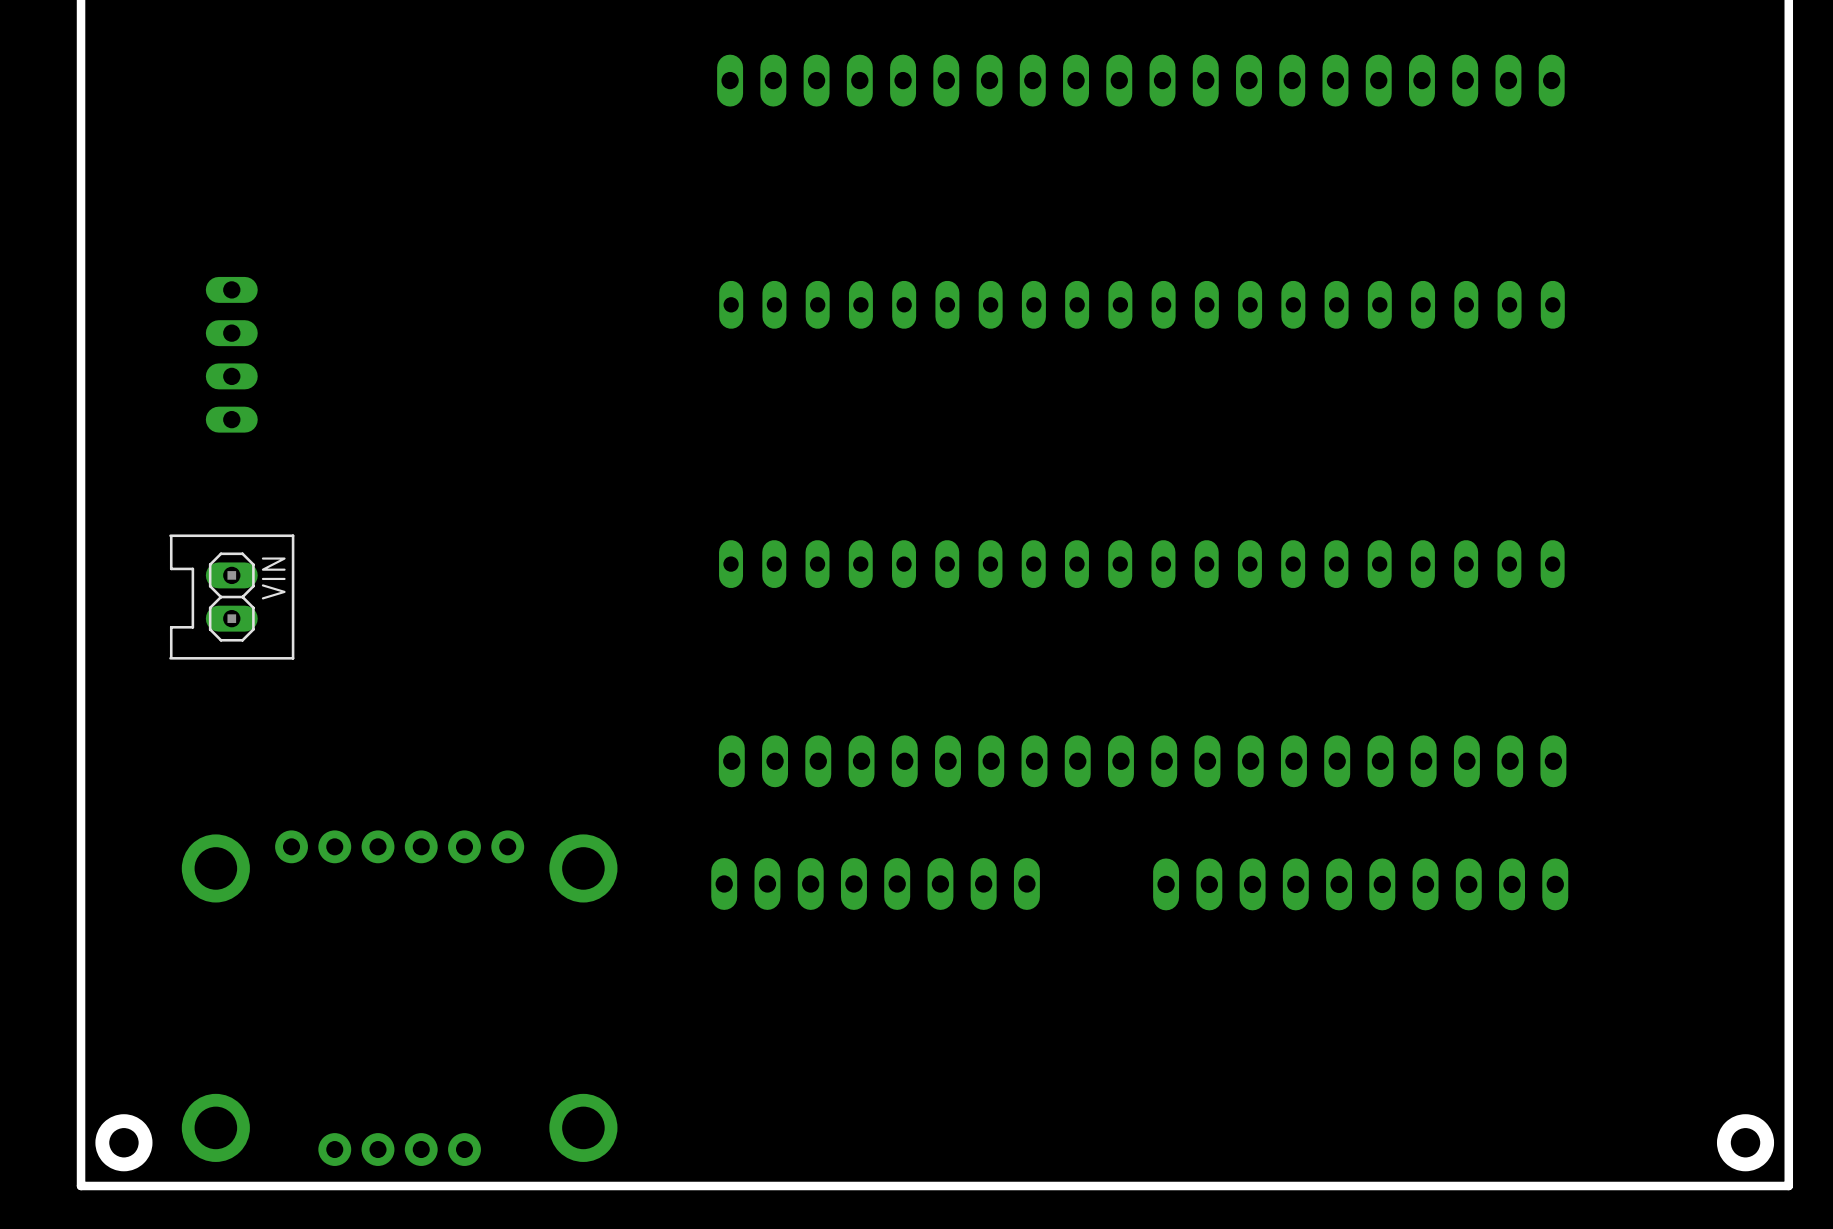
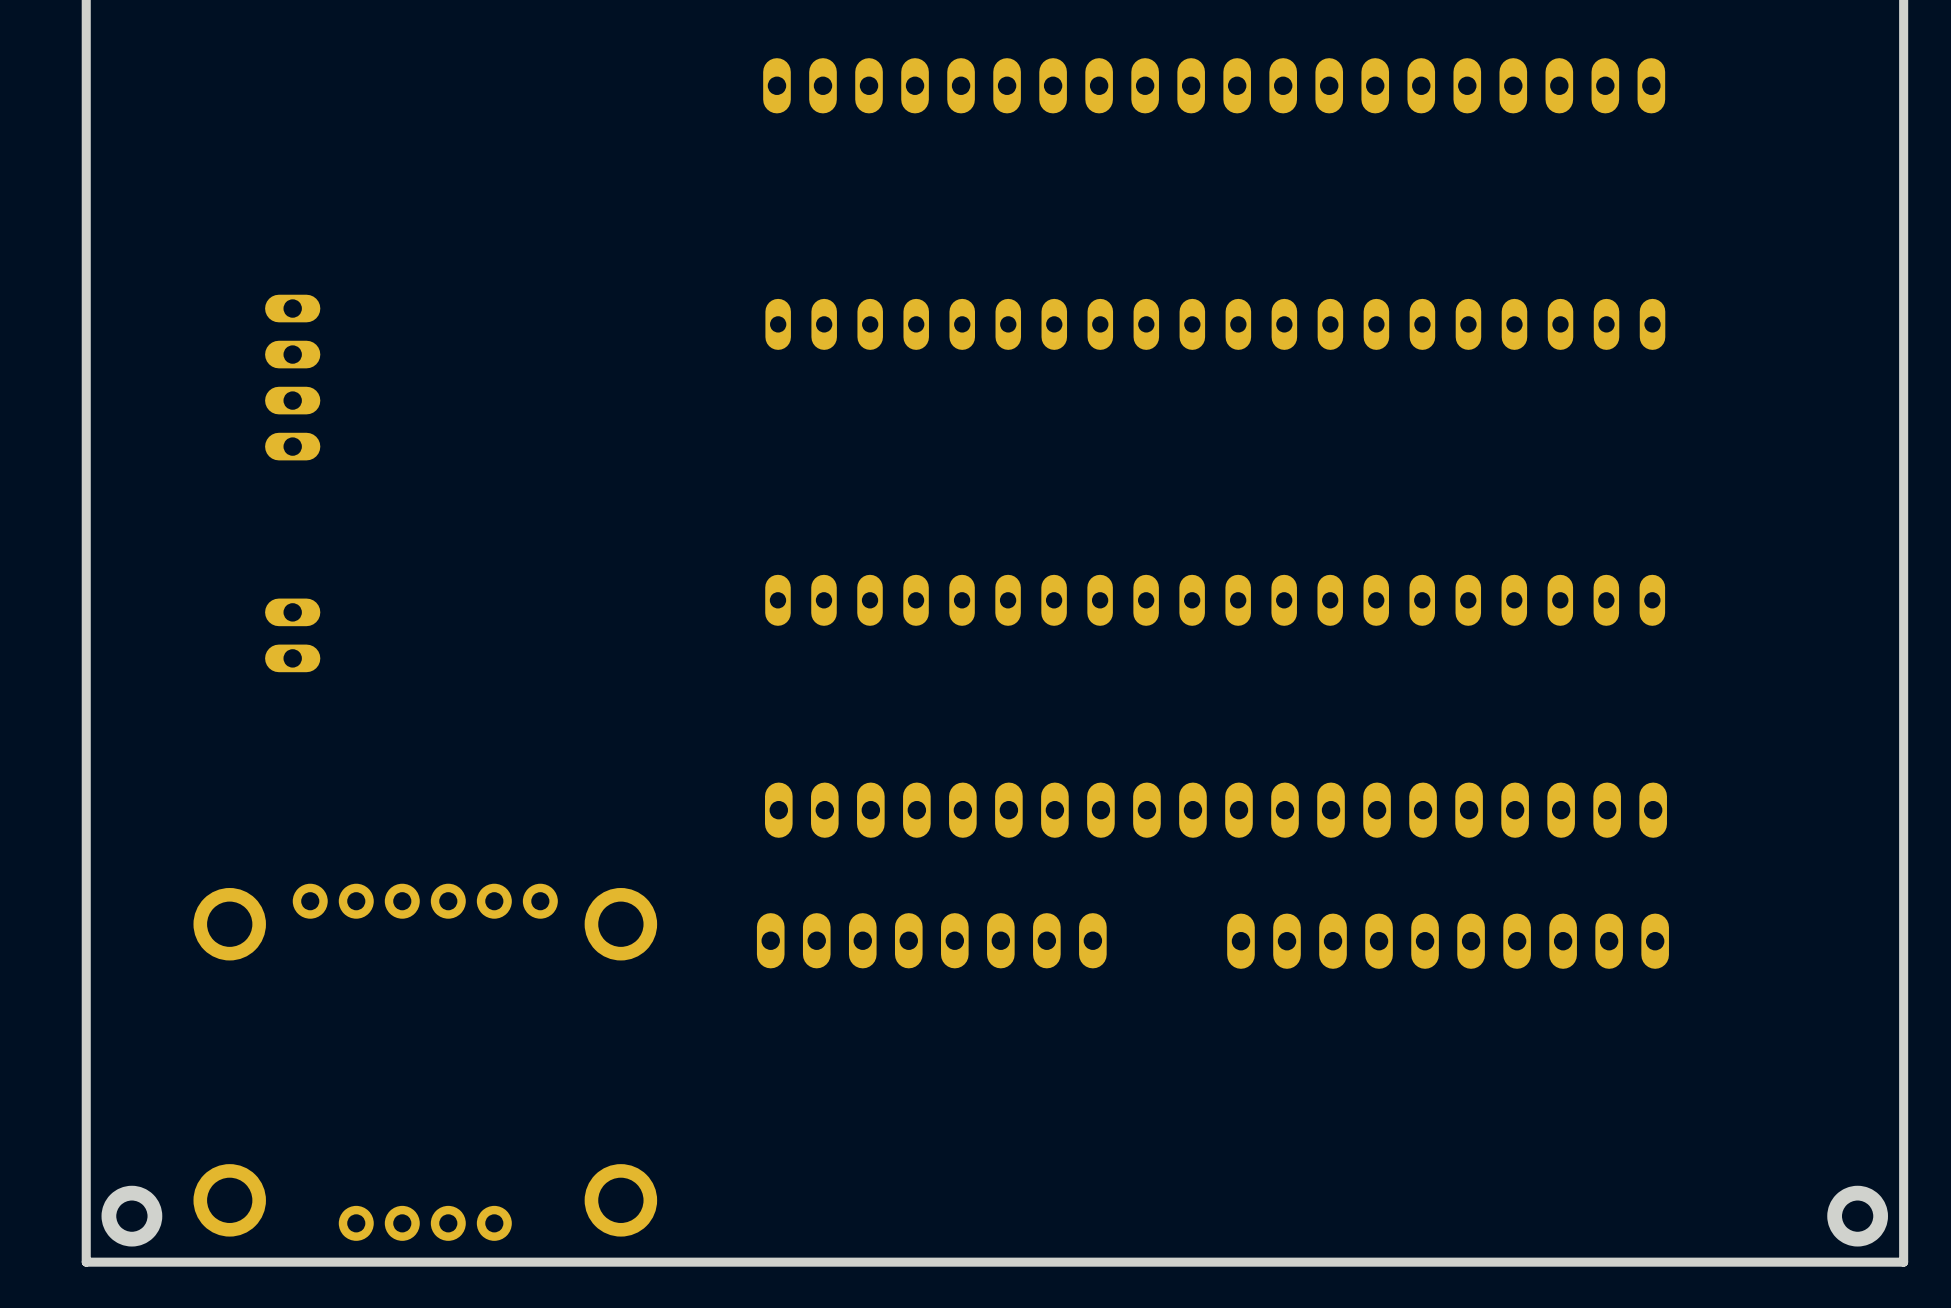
part position: (231, 354) -> (292, 377)
VIN side: bottom (231, 597) -> top (292, 635)

